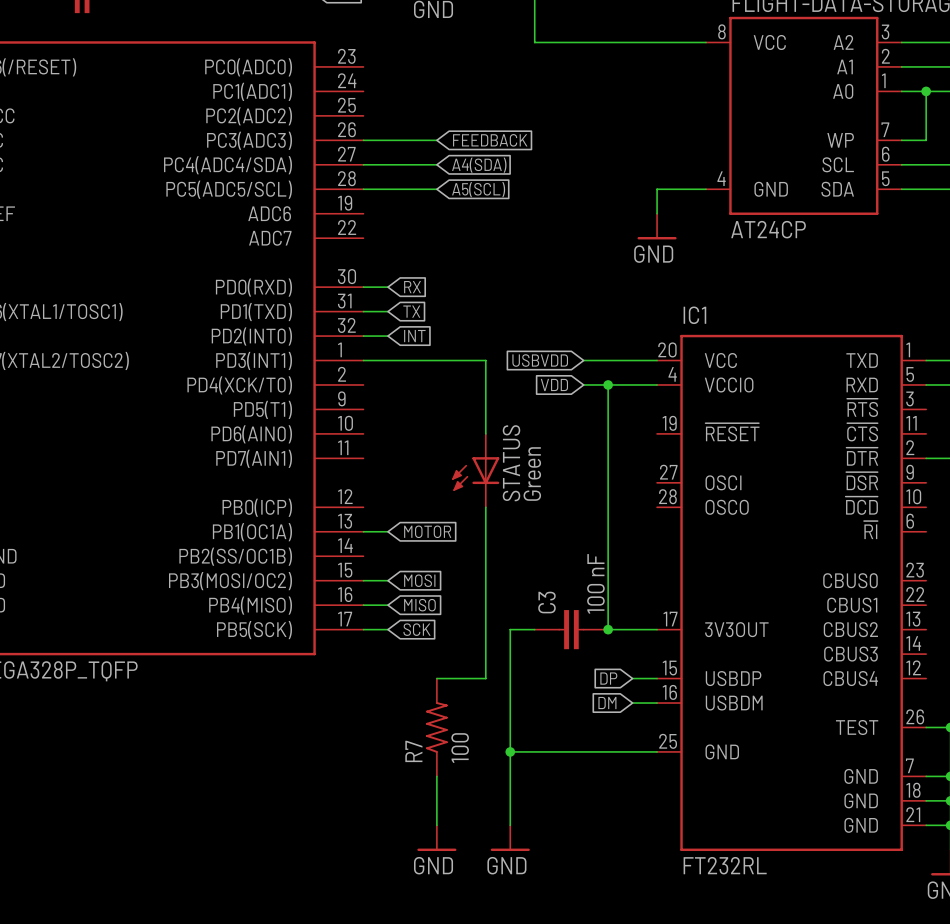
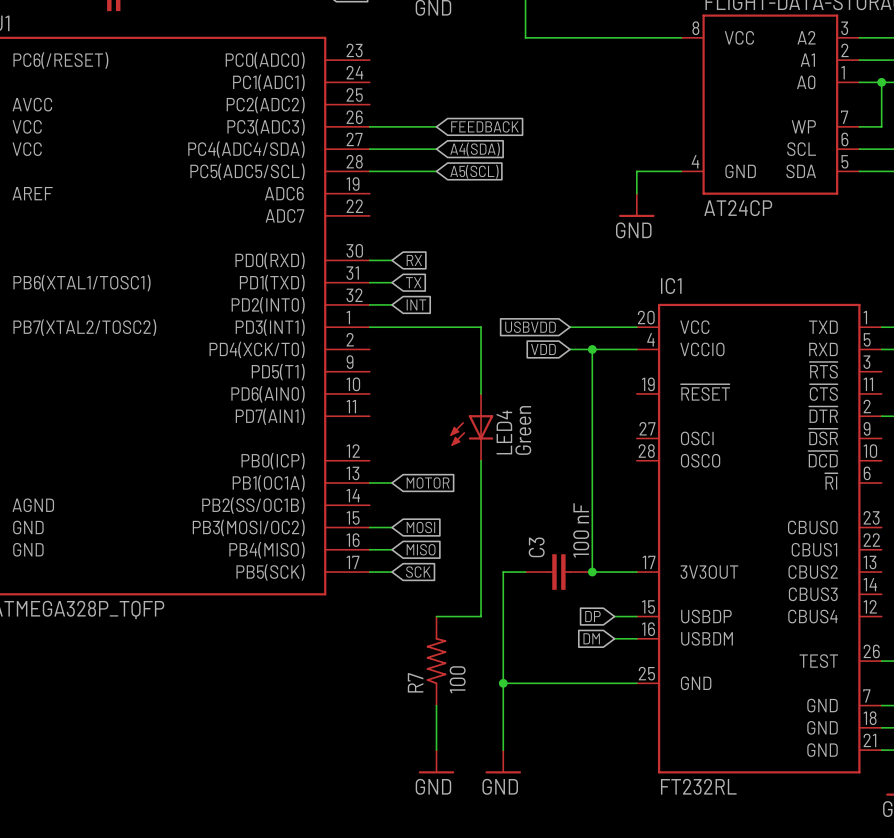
STATUS name: STATUS (511, 463) -> LED4 (504, 432)

